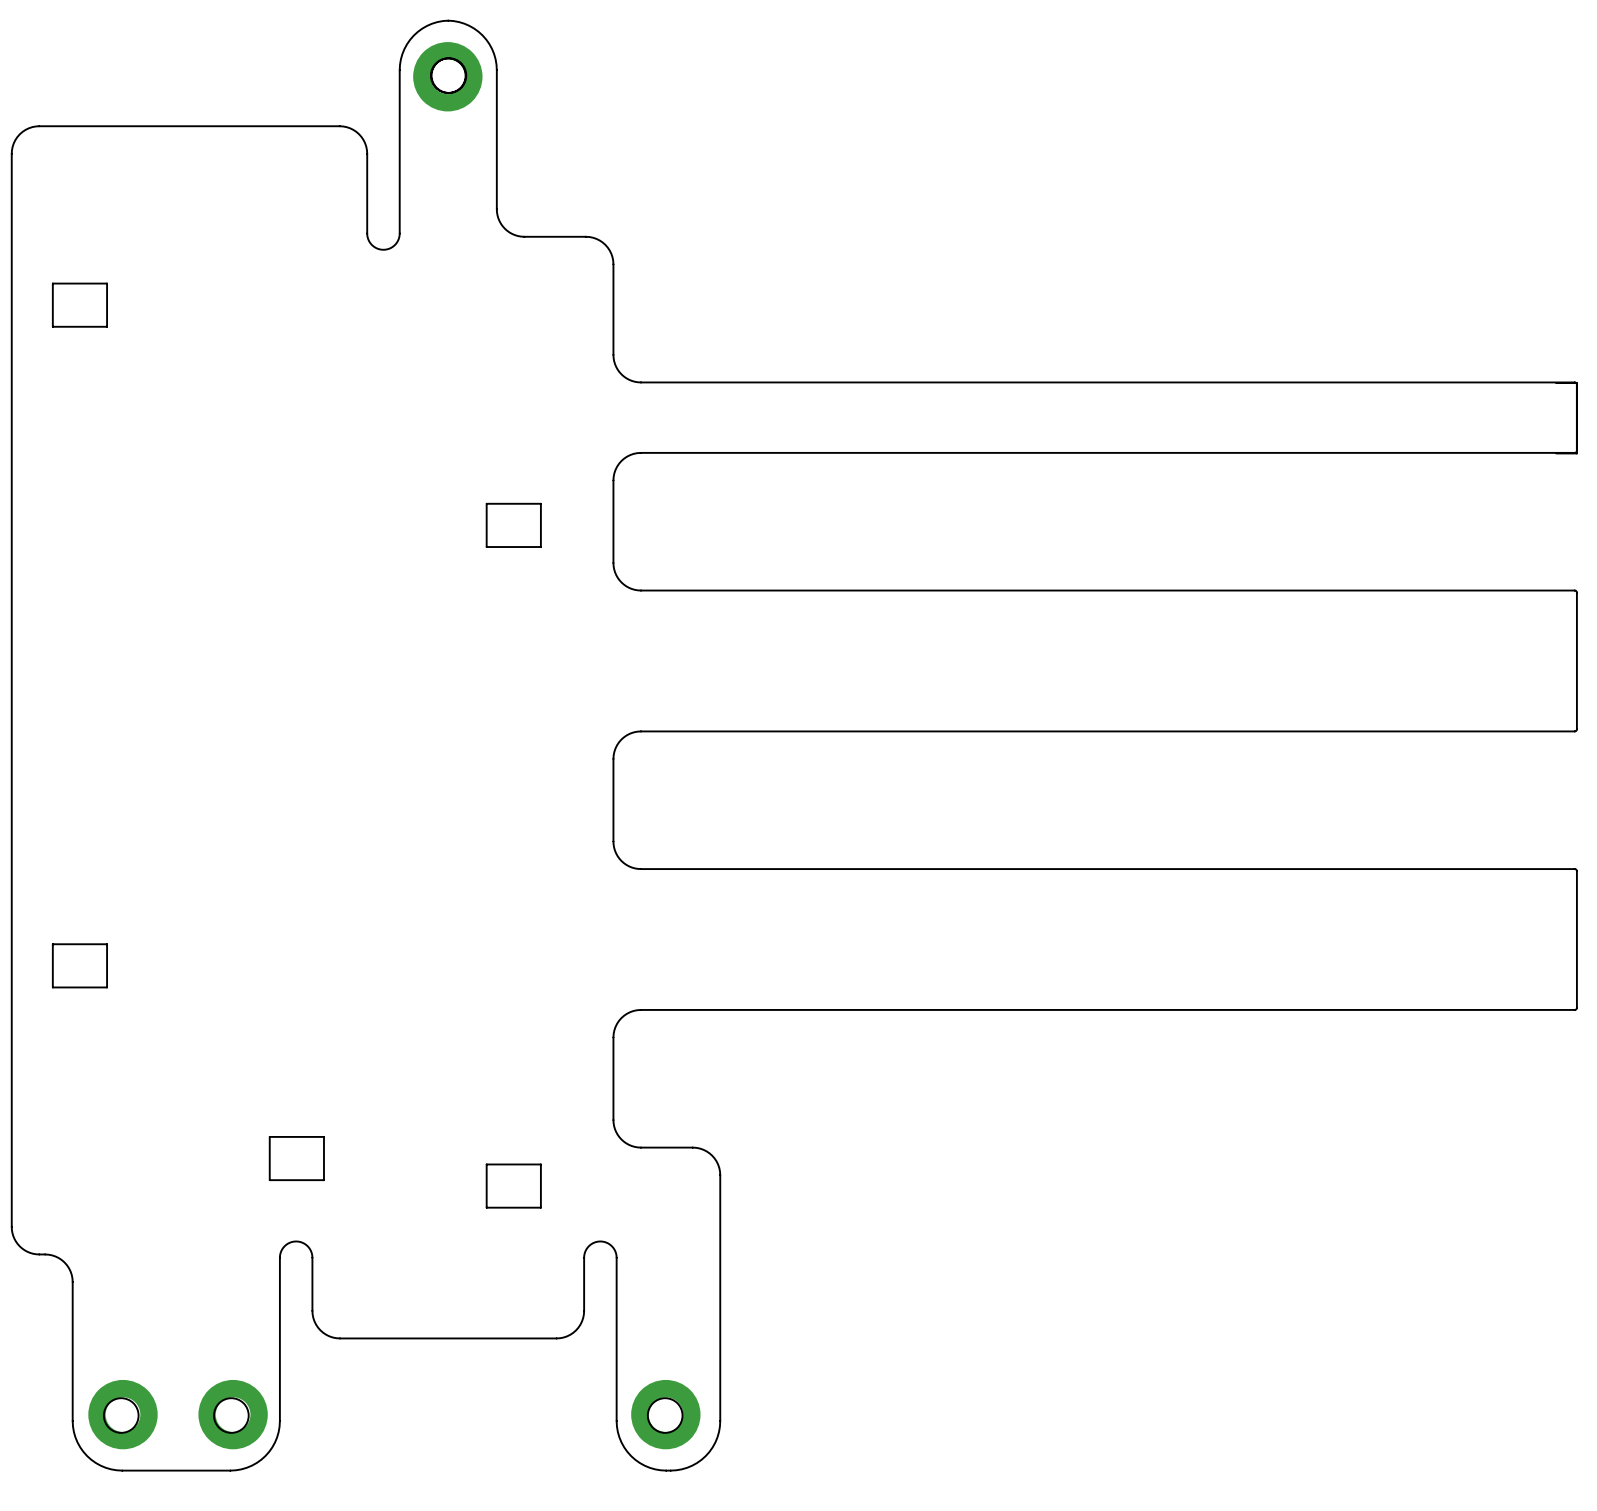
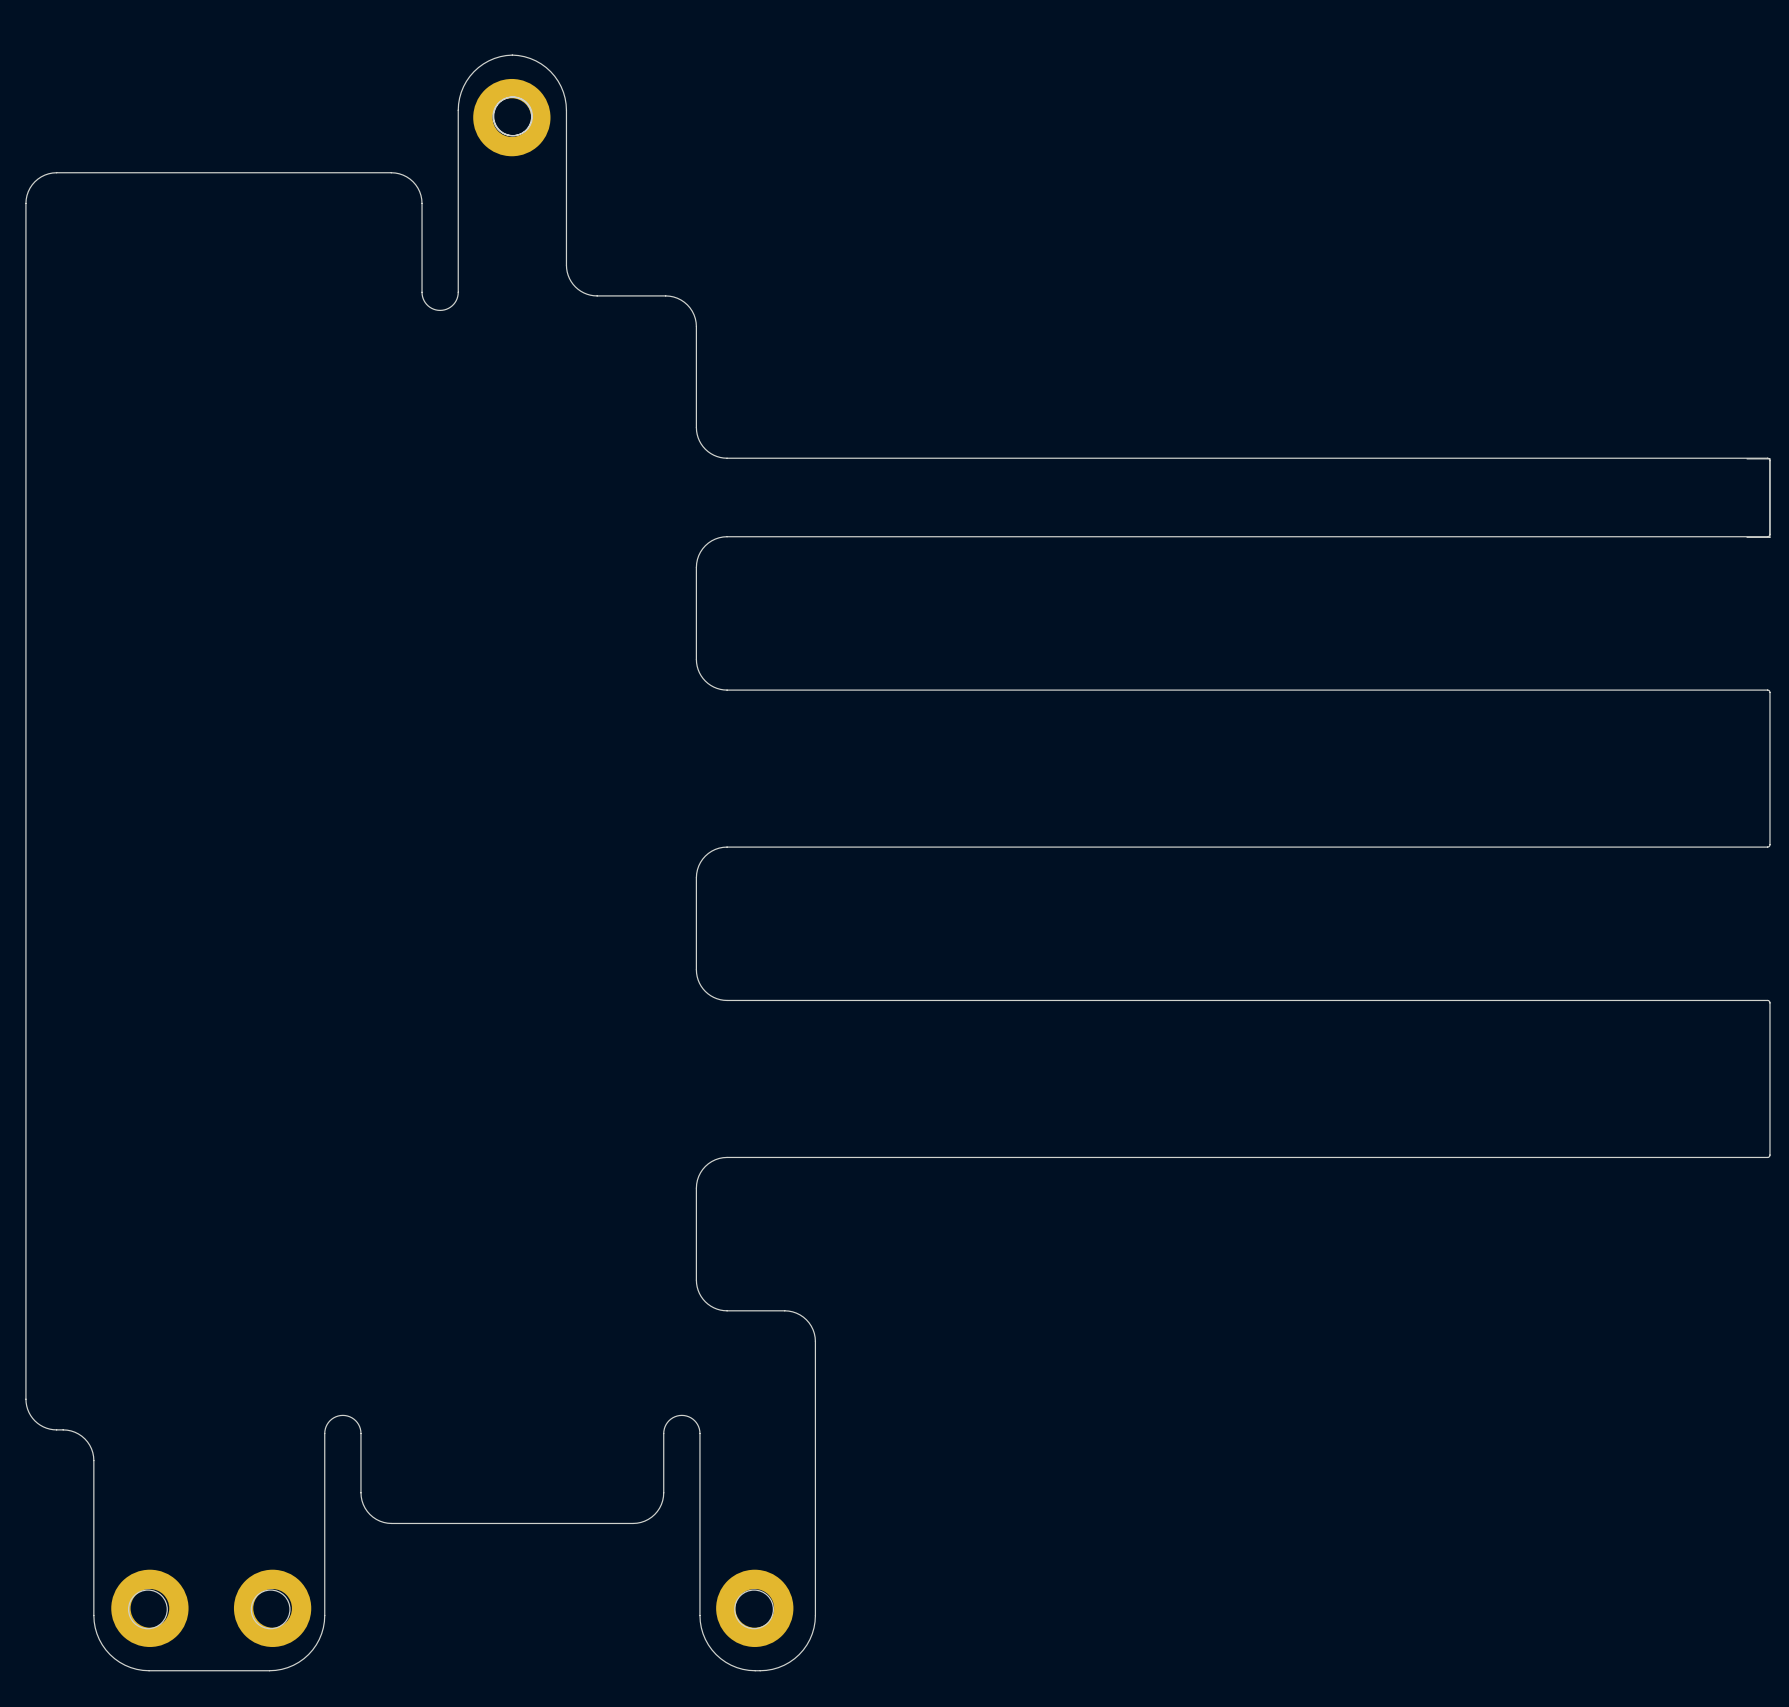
board edge: (107, 283) (107, 326) (52, 326) (52, 283) (107, 283) -> none
board edge: (540, 503) (540, 547) (486, 547) (486, 503) (540, 503) -> none
board edge: (107, 944) (107, 987) (52, 987) (52, 944) (107, 944) -> none
board edge: (323, 1136) (323, 1180) (269, 1180) (269, 1136) (323, 1136) -> none
board edge: (540, 1164) (540, 1207) (486, 1207) (486, 1164) (540, 1164) -> none

